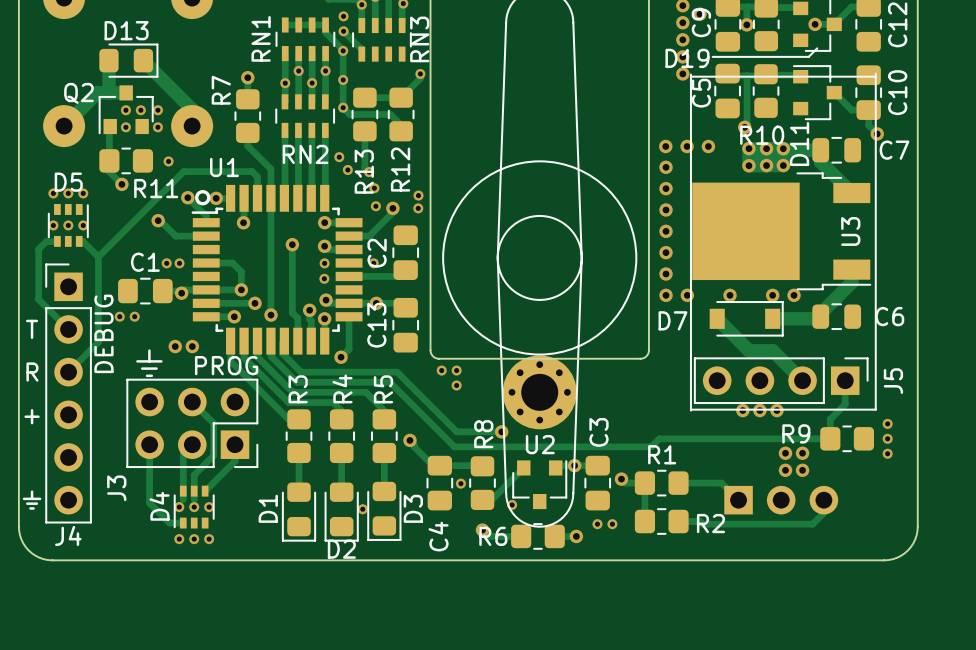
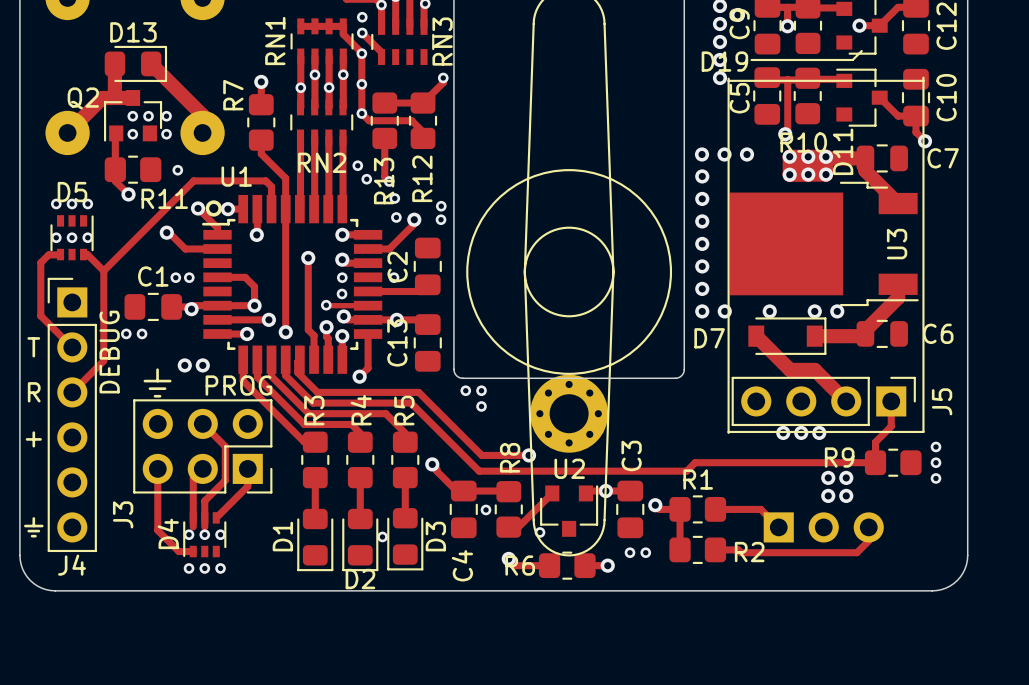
track: none -> (326, 305) (368, 305)
via: none -> (326, 305)

